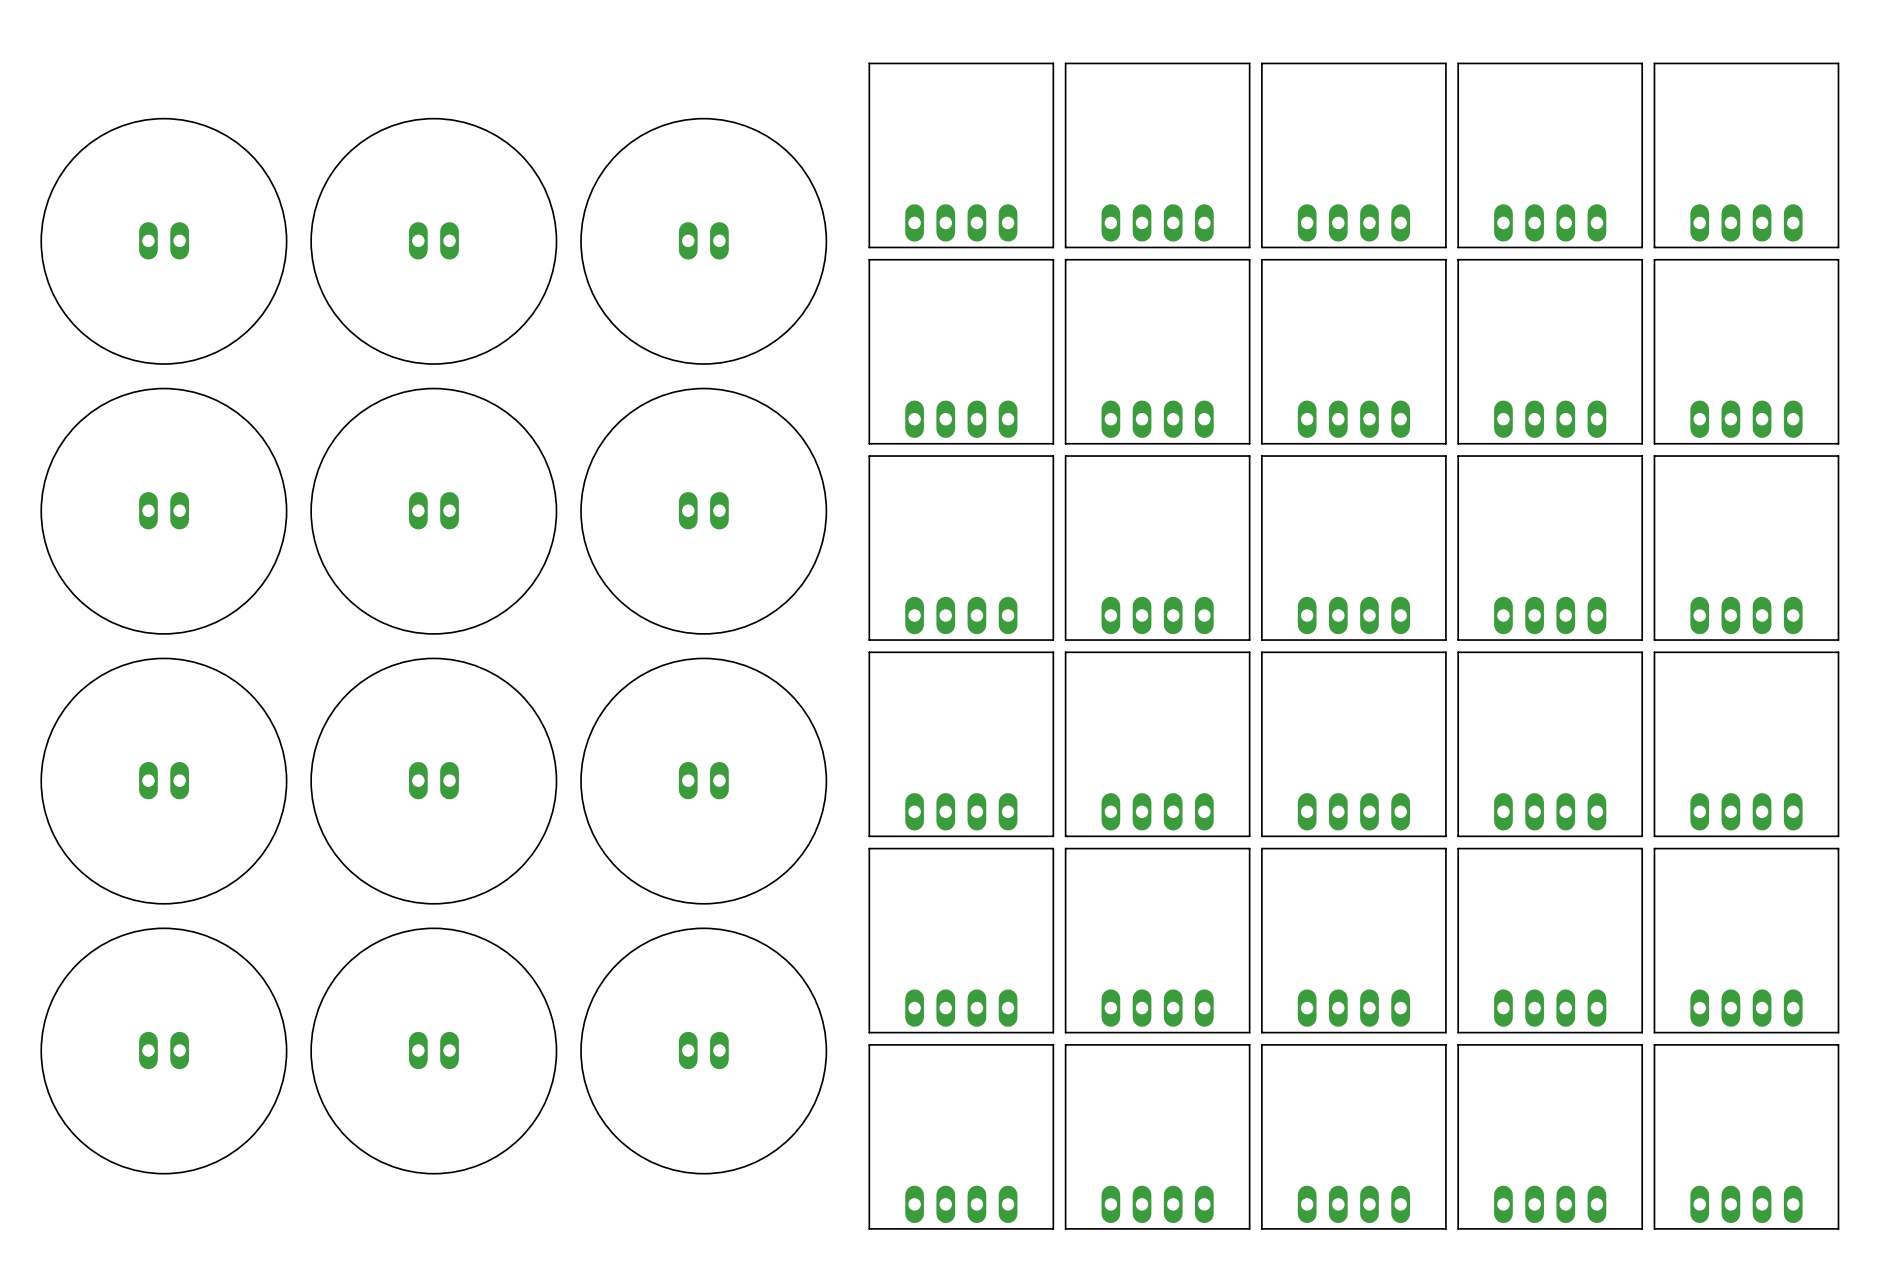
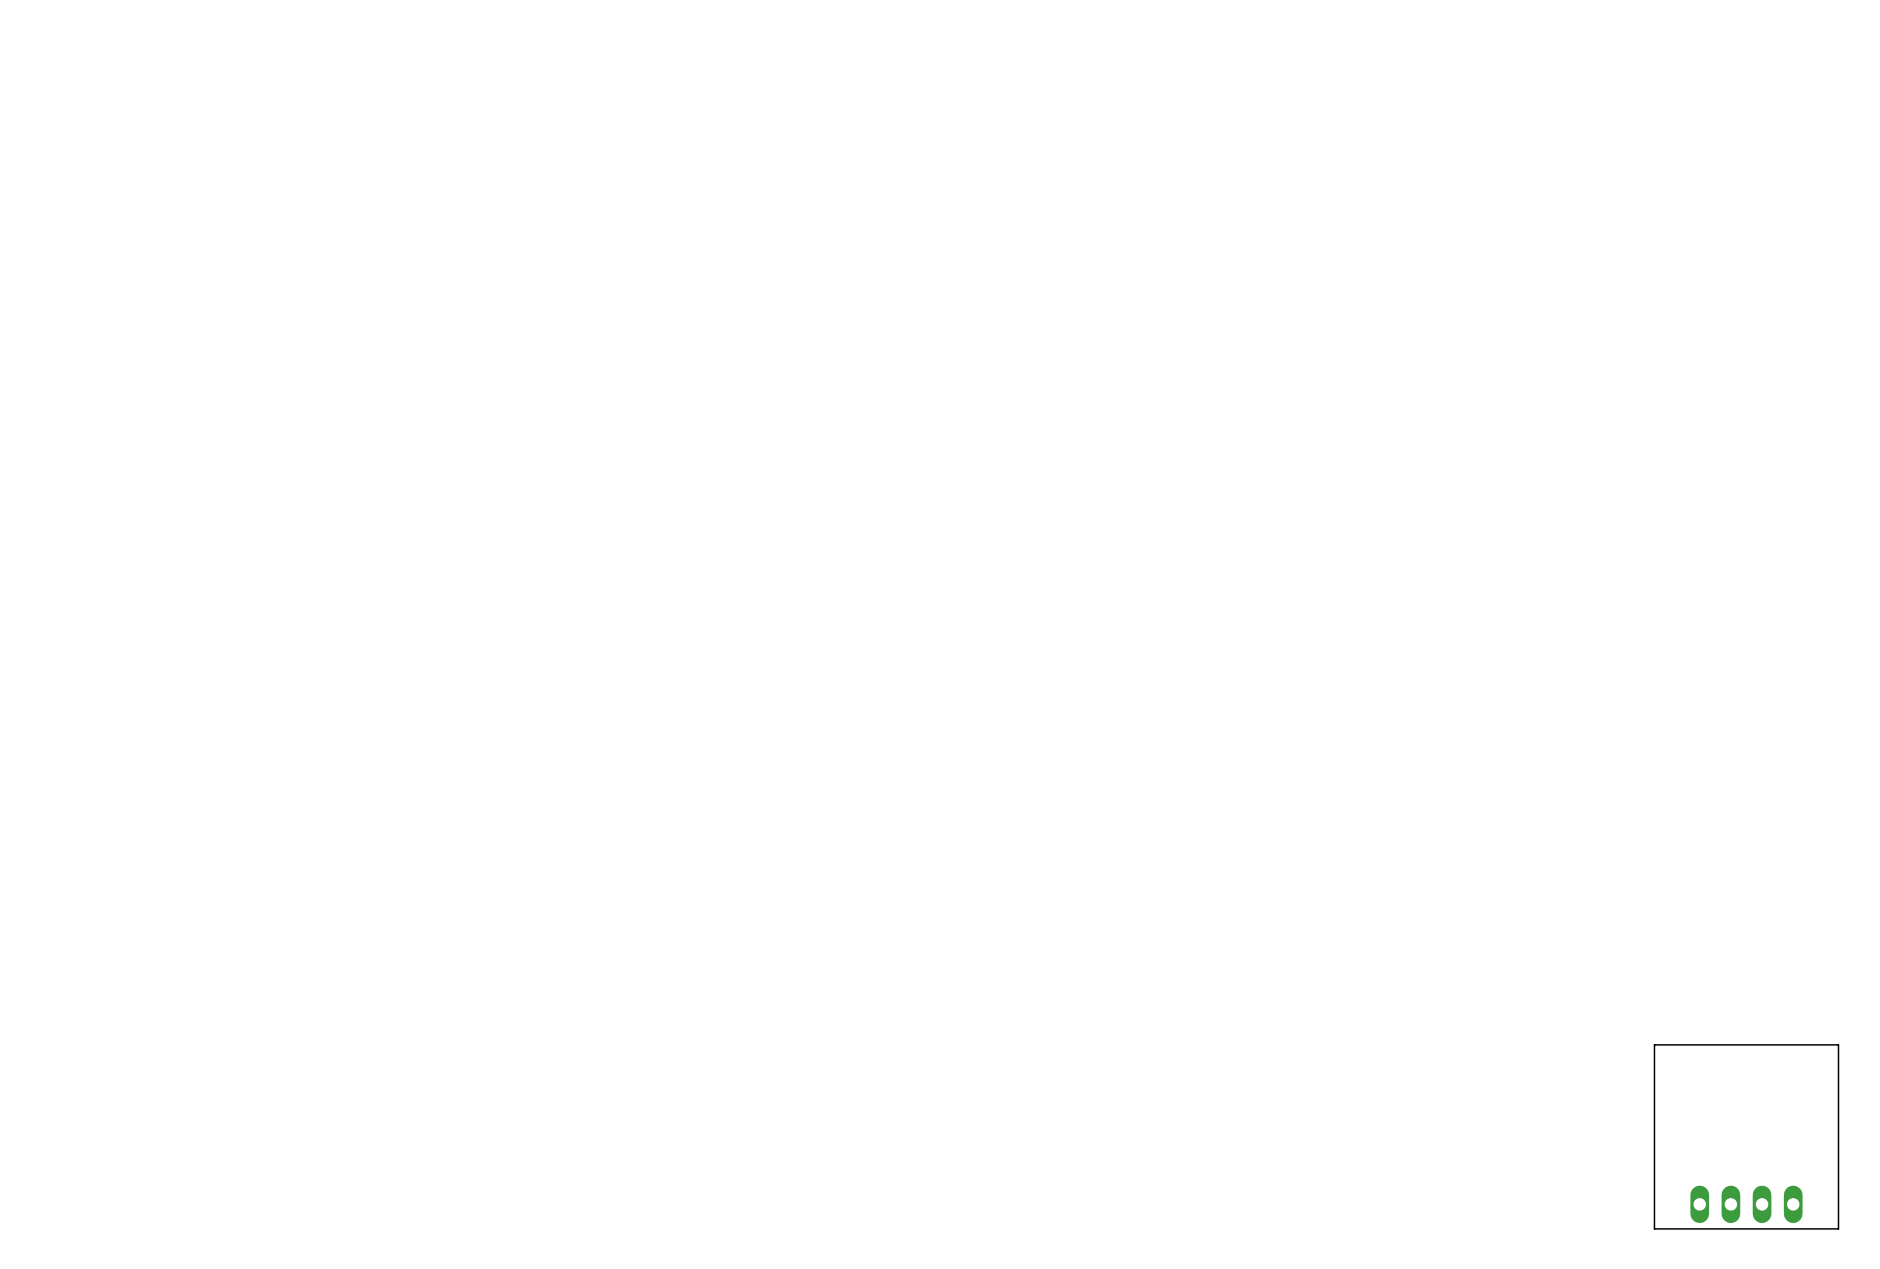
board edge: (1053, 63) (869, 63) (869, 247) (1053, 247) (1053, 63) -> none
board edge: (1249, 63) (1249, 247) (1065, 247) (1065, 63) (1249, 63) -> none
board edge: (1445, 63) (1445, 247) (1261, 247) (1261, 63) (1445, 63) -> none
board edge: (1642, 63) (1642, 247) (1458, 247) (1458, 63) (1642, 63) -> none
board edge: (1838, 63) (1838, 247) (1654, 247) (1654, 63) (1838, 63) -> none
round board edge: [40, 118, 288, 365] -> none
round board edge: [310, 118, 558, 365] -> none
round board edge: [580, 118, 828, 365] -> none
part: (961, 222) -> none
part: (1157, 222) -> none
part: (1353, 222) -> none
part: (1550, 222) -> none
part: (1746, 222) -> none
part: (164, 240) -> none
part: (433, 240) -> none
part: (703, 240) -> none
board edge: (1053, 259) (869, 259) (869, 443) (1053, 443) (1053, 259) -> none
board edge: (1249, 259) (1249, 443) (1065, 443) (1065, 259) (1249, 259) -> none
board edge: (1445, 259) (1445, 443) (1261, 443) (1261, 259) (1445, 259) -> none
board edge: (1642, 259) (1642, 443) (1458, 443) (1458, 259) (1642, 259) -> none
board edge: (1838, 259) (1838, 443) (1654, 443) (1654, 259) (1838, 259) -> none
round board edge: [40, 387, 288, 635] -> none
round board edge: [310, 387, 558, 635] -> none
round board edge: [580, 387, 828, 635] -> none
part: (961, 419) -> none
part: (1157, 419) -> none
part: (1353, 419) -> none
part: (1550, 419) -> none
part: (1746, 419) -> none
board edge: (1053, 456) (869, 456) (869, 640) (1053, 640) (1053, 456) -> none
board edge: (1249, 456) (1249, 640) (1065, 640) (1065, 456) (1249, 456) -> none
board edge: (1445, 456) (1445, 640) (1261, 640) (1261, 456) (1445, 456) -> none
board edge: (1642, 456) (1642, 640) (1458, 640) (1458, 456) (1642, 456) -> none
board edge: (1838, 456) (1838, 640) (1654, 640) (1654, 456) (1838, 456) -> none
part: (164, 510) -> none
part: (433, 510) -> none
part: (703, 510) -> none
part: (961, 615) -> none
part: (1157, 615) -> none
part: (1353, 615) -> none
part: (1550, 615) -> none
part: (1746, 615) -> none
board edge: (1053, 652) (869, 652) (869, 836) (1053, 836) (1053, 652) -> none
board edge: (1249, 652) (1249, 836) (1065, 836) (1065, 652) (1249, 652) -> none
board edge: (1445, 652) (1445, 836) (1261, 836) (1261, 652) (1445, 652) -> none
board edge: (1642, 652) (1642, 836) (1458, 836) (1458, 652) (1642, 652) -> none
board edge: (1838, 652) (1838, 836) (1654, 836) (1654, 652) (1838, 652) -> none
round board edge: [40, 657, 288, 905] -> none
round board edge: [310, 657, 558, 905] -> none
round board edge: [580, 657, 828, 905] -> none
part: (164, 780) -> none
part: (433, 780) -> none
part: (703, 780) -> none
part: (961, 811) -> none
part: (1157, 811) -> none
part: (1353, 811) -> none
part: (1550, 811) -> none
part: (1746, 811) -> none
board edge: (1053, 848) (869, 848) (869, 1032) (1053, 1032) (1053, 848) -> none
board edge: (1249, 848) (1249, 1032) (1065, 1032) (1065, 848) (1249, 848) -> none
board edge: (1445, 848) (1445, 1032) (1261, 1032) (1261, 848) (1445, 848) -> none
board edge: (1642, 848) (1642, 1032) (1458, 1032) (1458, 848) (1642, 848) -> none
board edge: (1838, 848) (1838, 1032) (1654, 1032) (1654, 848) (1838, 848) -> none
round board edge: [40, 927, 288, 1175] -> none
round board edge: [310, 927, 558, 1175] -> none
round board edge: [580, 927, 828, 1175] -> none
part: (961, 1008) -> none
part: (1157, 1008) -> none
part: (1353, 1008) -> none
part: (1550, 1008) -> none
part: (1746, 1008) -> none
board edge: (1053, 1044) (869, 1044) (869, 1228) (1053, 1228) (1053, 1044) -> none
board edge: (1249, 1044) (1065, 1044) (1065, 1228) (1249, 1228) (1249, 1044) -> none
board edge: (1445, 1044) (1261, 1044) (1261, 1228) (1445, 1228) (1445, 1044) -> none
board edge: (1642, 1044) (1458, 1044) (1458, 1228) (1642, 1228) (1642, 1044) -> none
part: (164, 1050) -> none
part: (433, 1050) -> none
part: (703, 1050) -> none
part: (961, 1204) -> none
part: (1157, 1204) -> none
part: (1353, 1204) -> none
part: (1550, 1204) -> none

